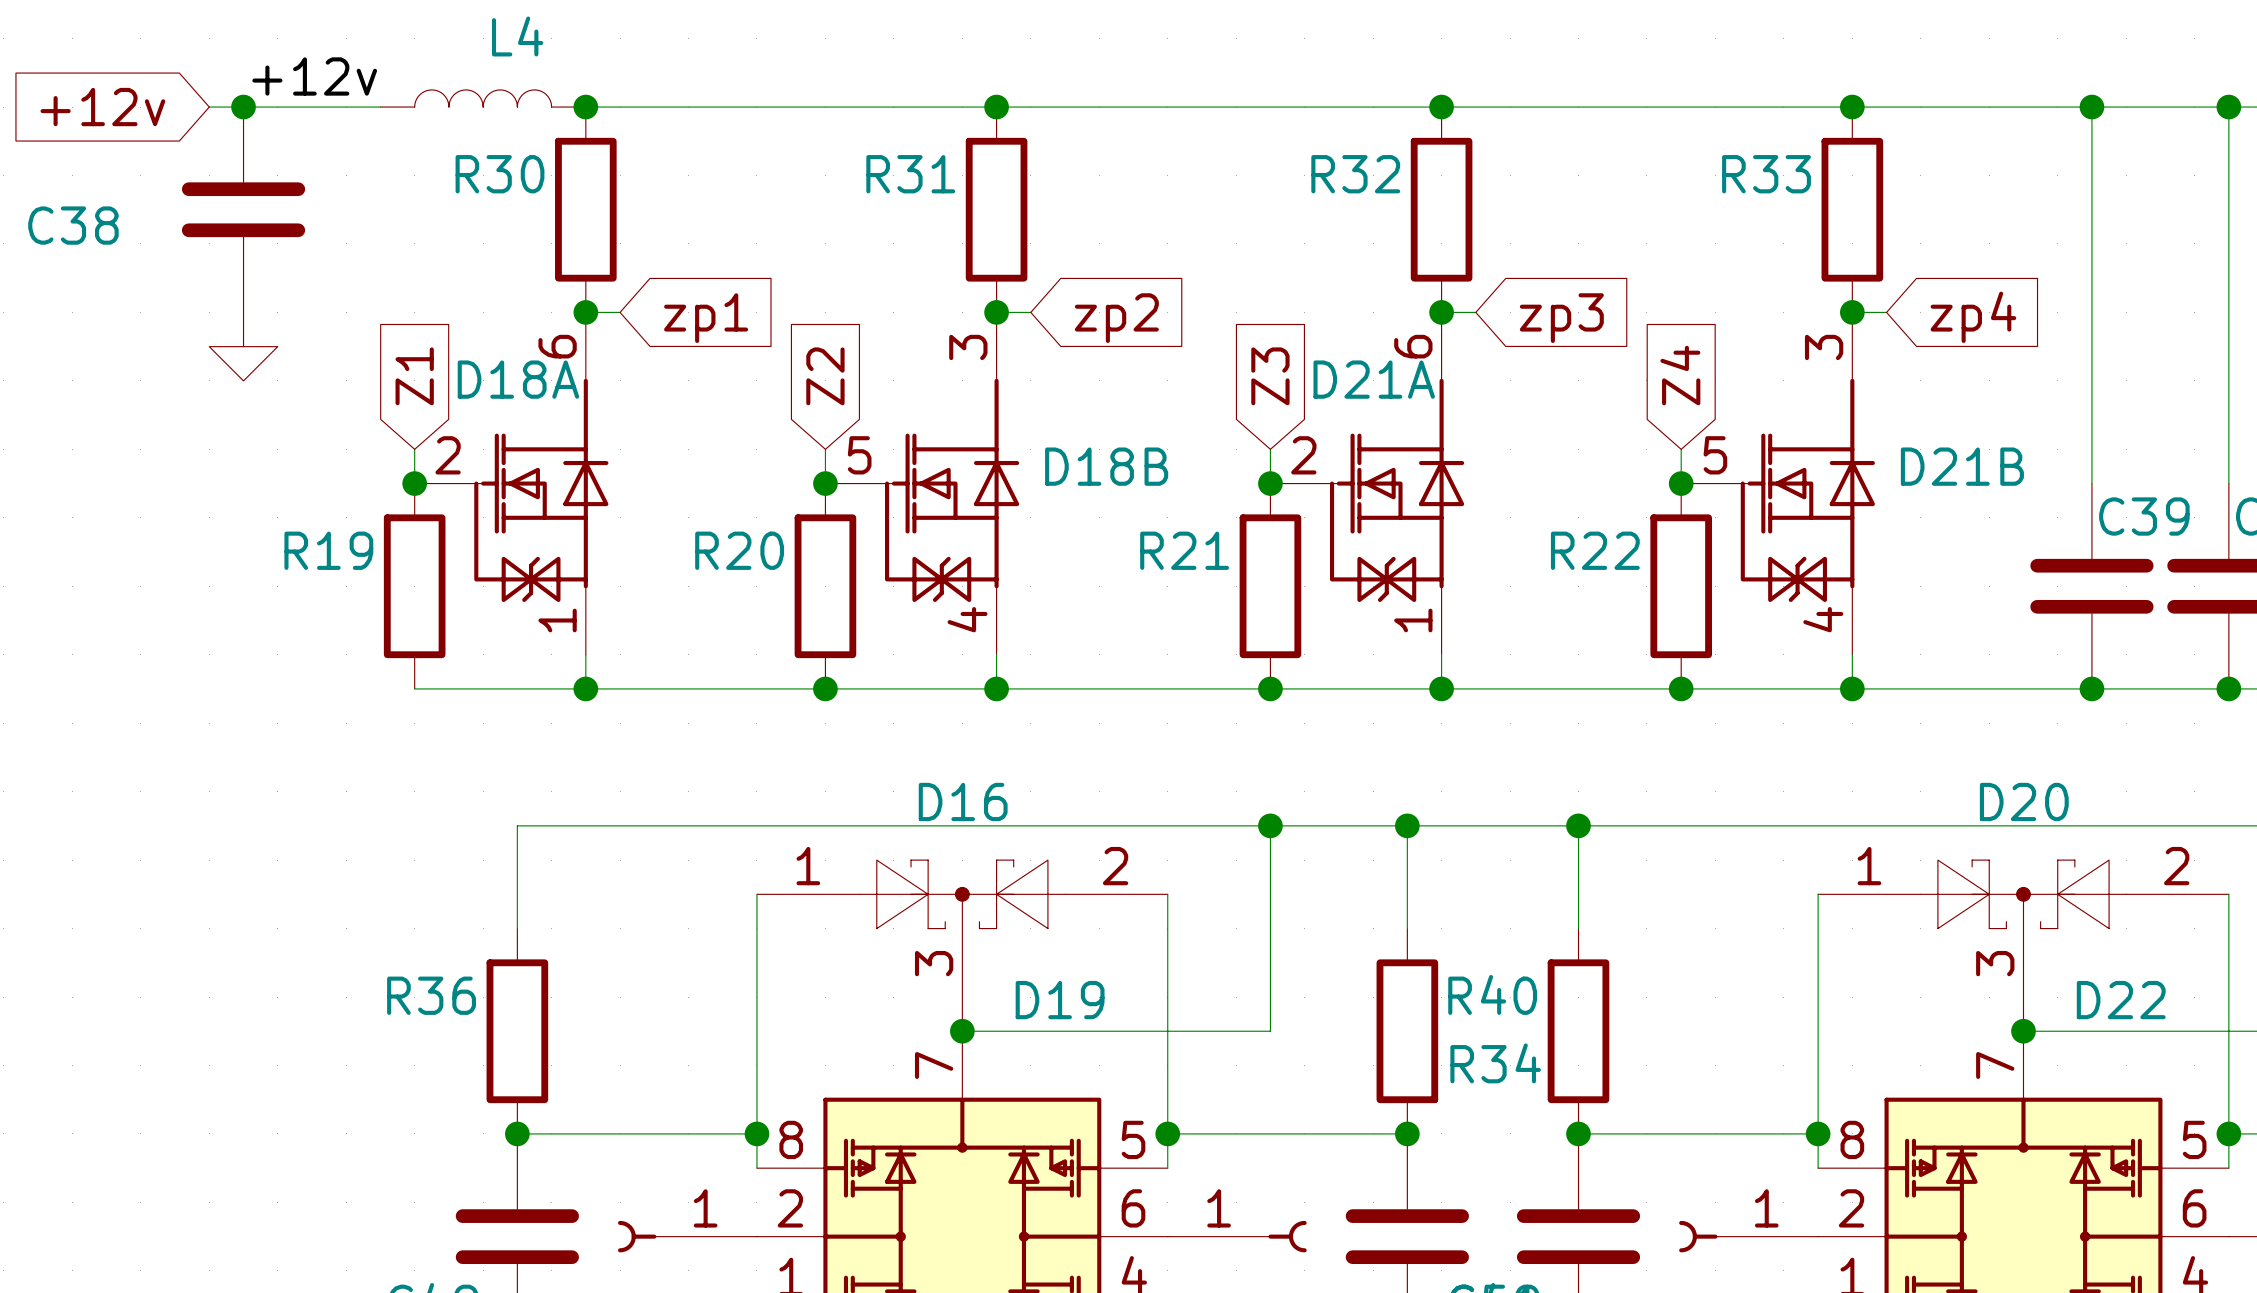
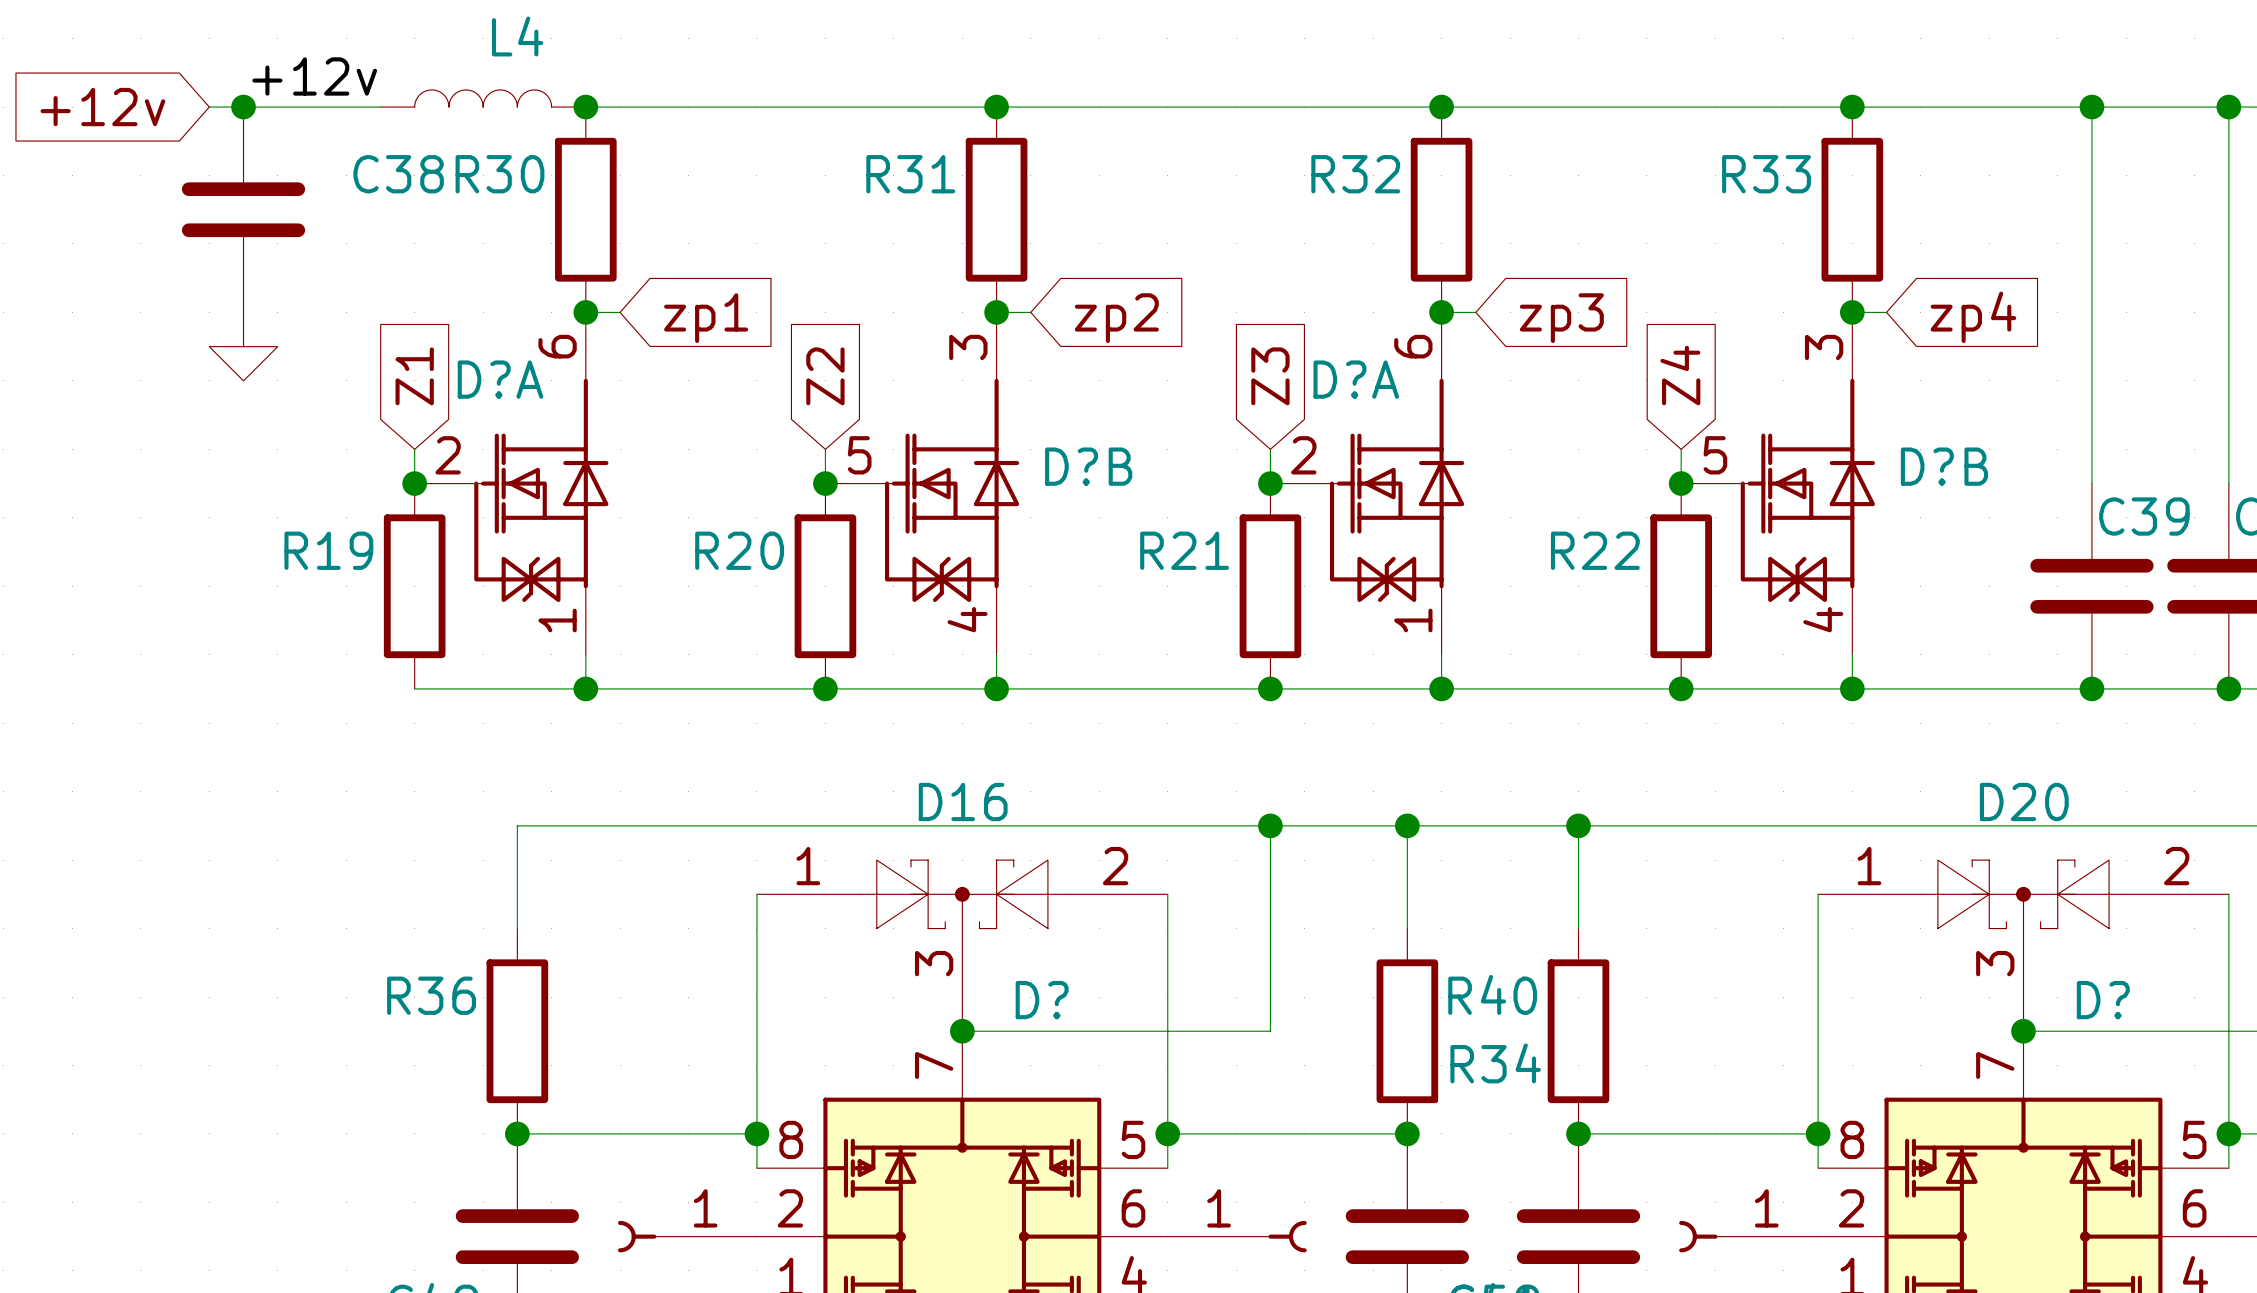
C38 name position: C38 (73, 225) -> C38 (398, 174)
D18A name: D18A (518, 379) -> D?A (500, 379)
D21A name: D21A (1374, 379) -> D?A (1356, 379)
D18B name: D18B (1106, 466) -> D?B (1088, 466)
D21B name: D21B (1962, 466) -> D?B (1944, 466)
D19 name: D19 (1060, 1000) -> D? (1042, 1000)
D22 name: D22 (2121, 1000) -> D? (2103, 1000)

